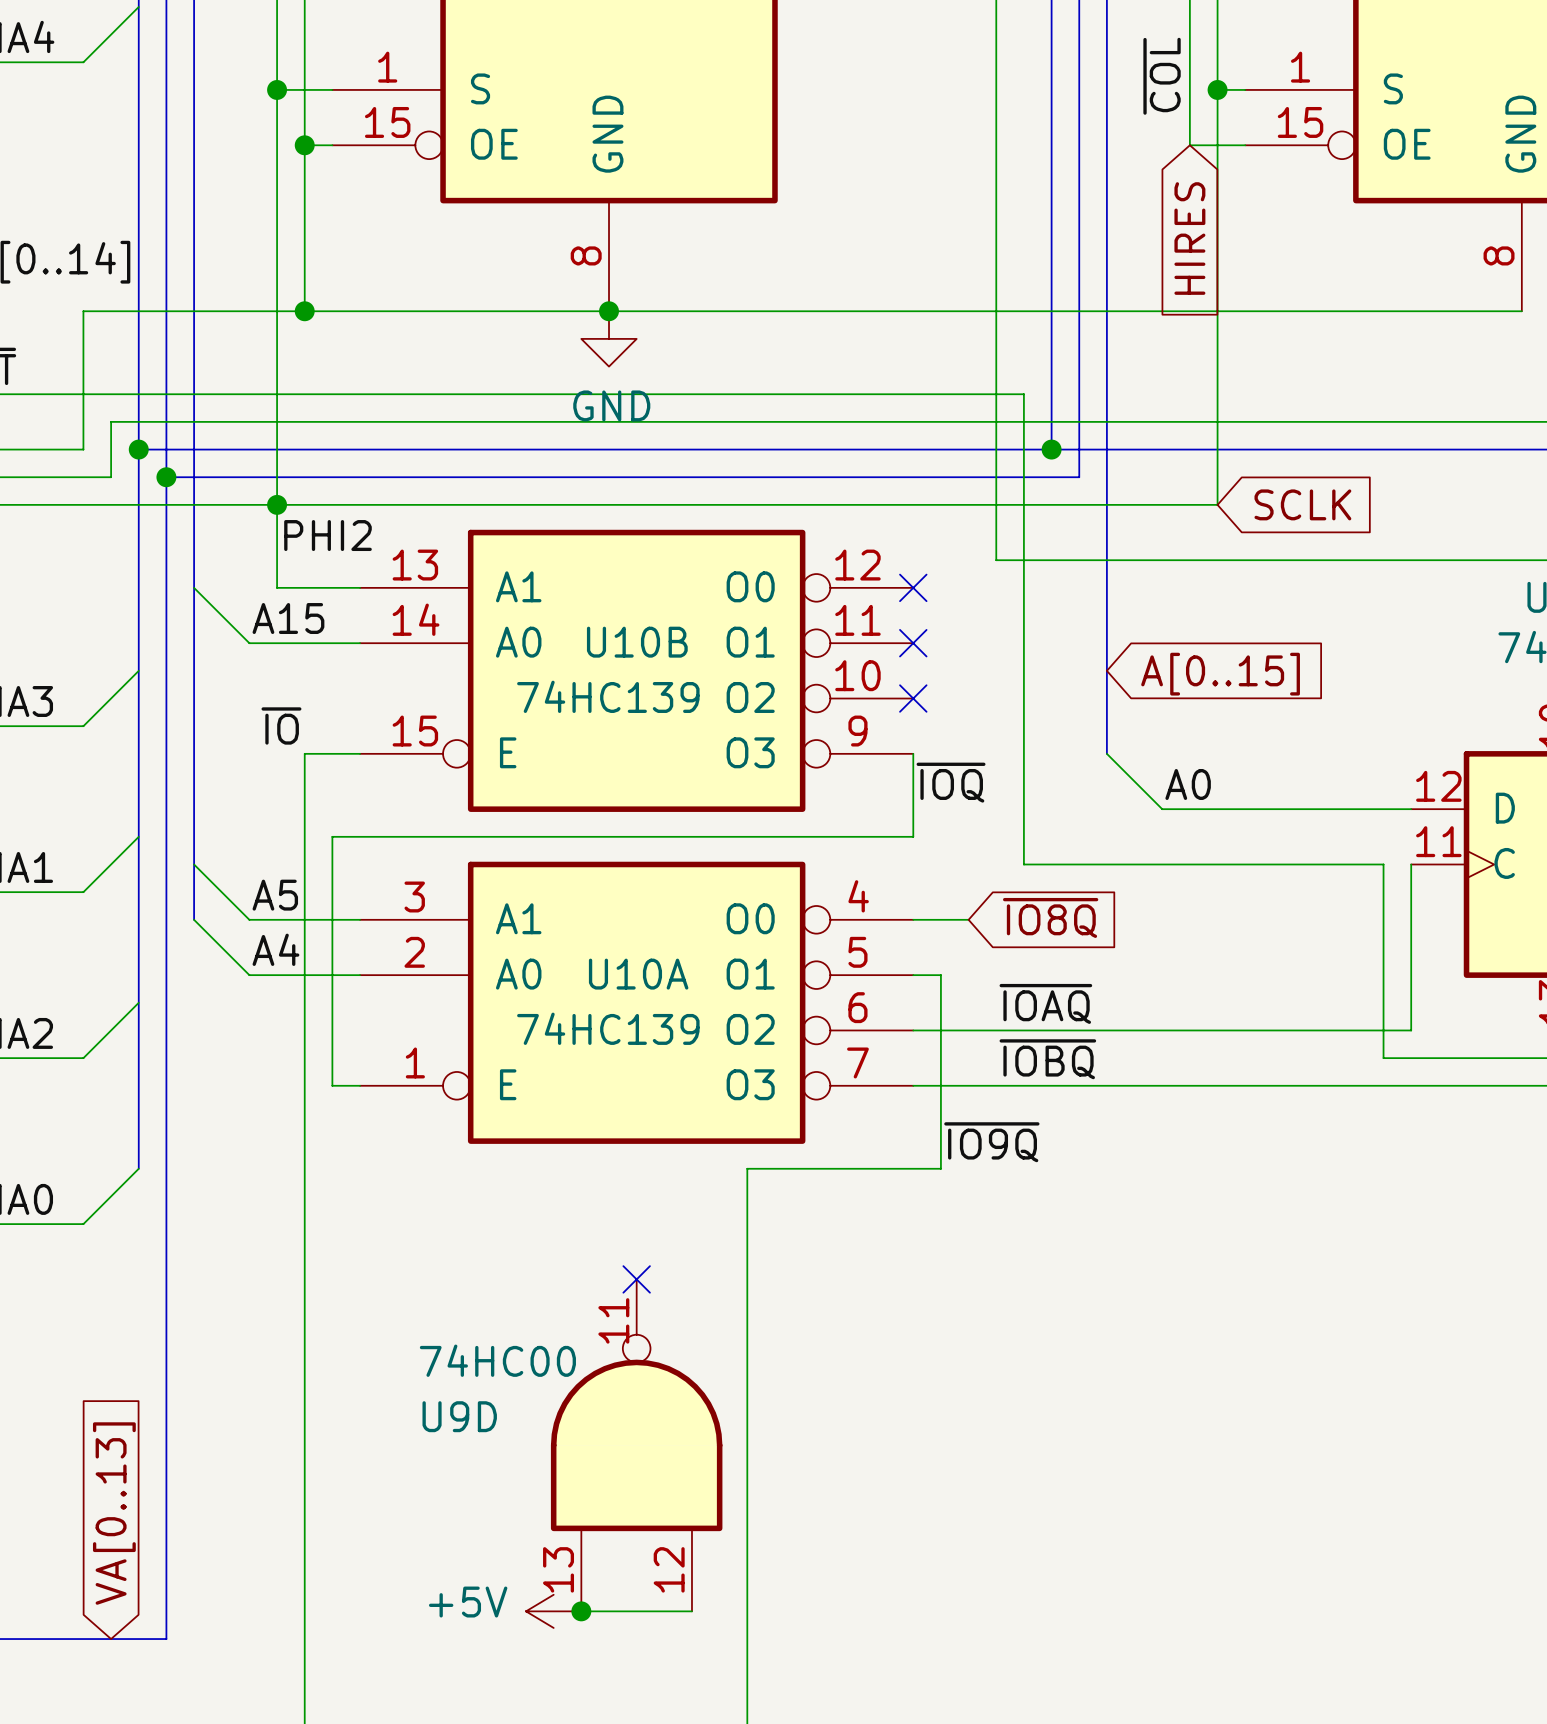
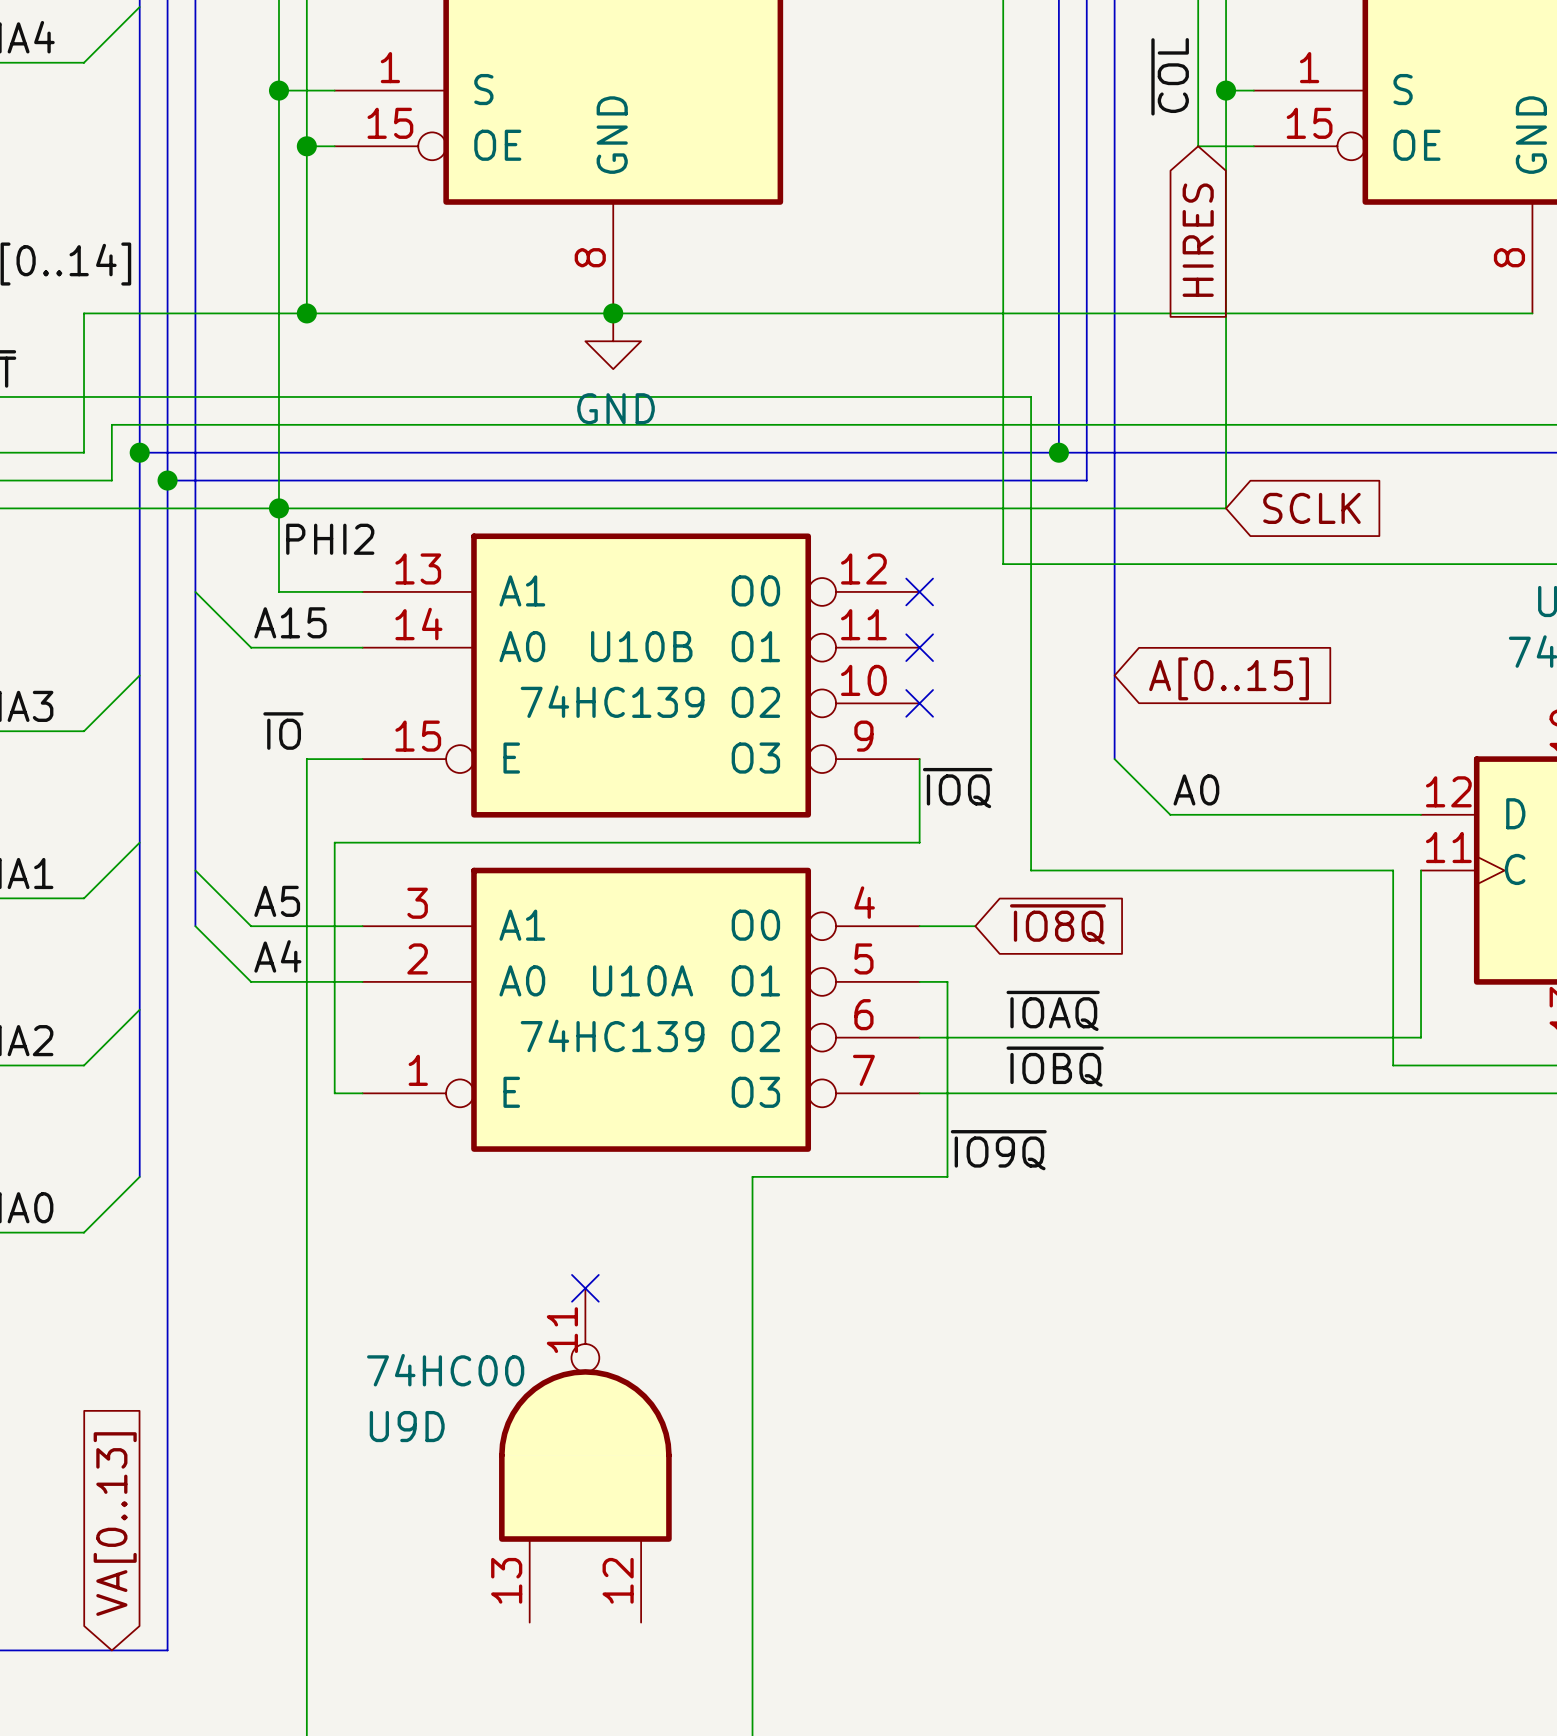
no-connect mark position: (636, 1279) -> (585, 1288)
U9D position: (636, 1445) -> (585, 1455)
power symbol: +5V (553, 1611) -> none
wire: (581, 1611) (691, 1611) -> none
junction: (581, 1611) -> none

